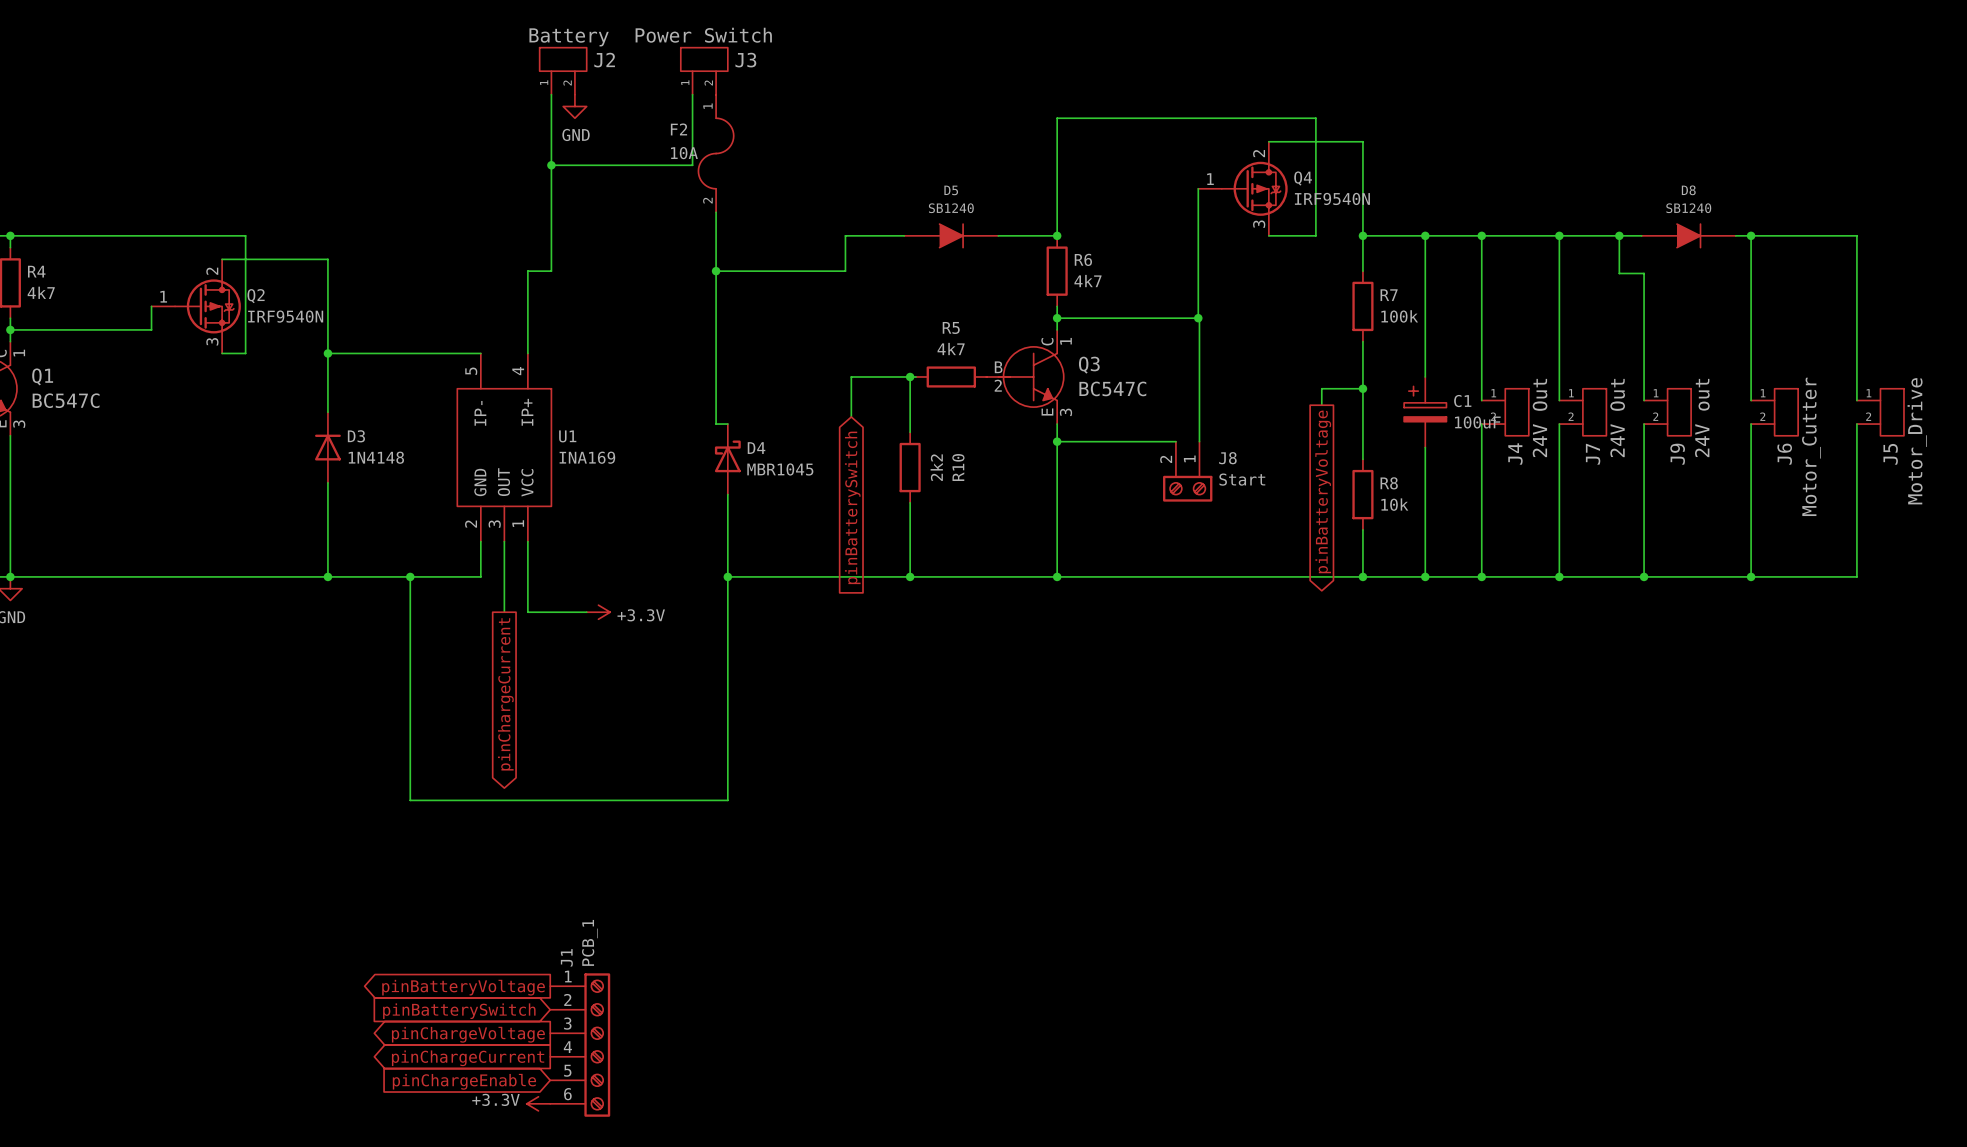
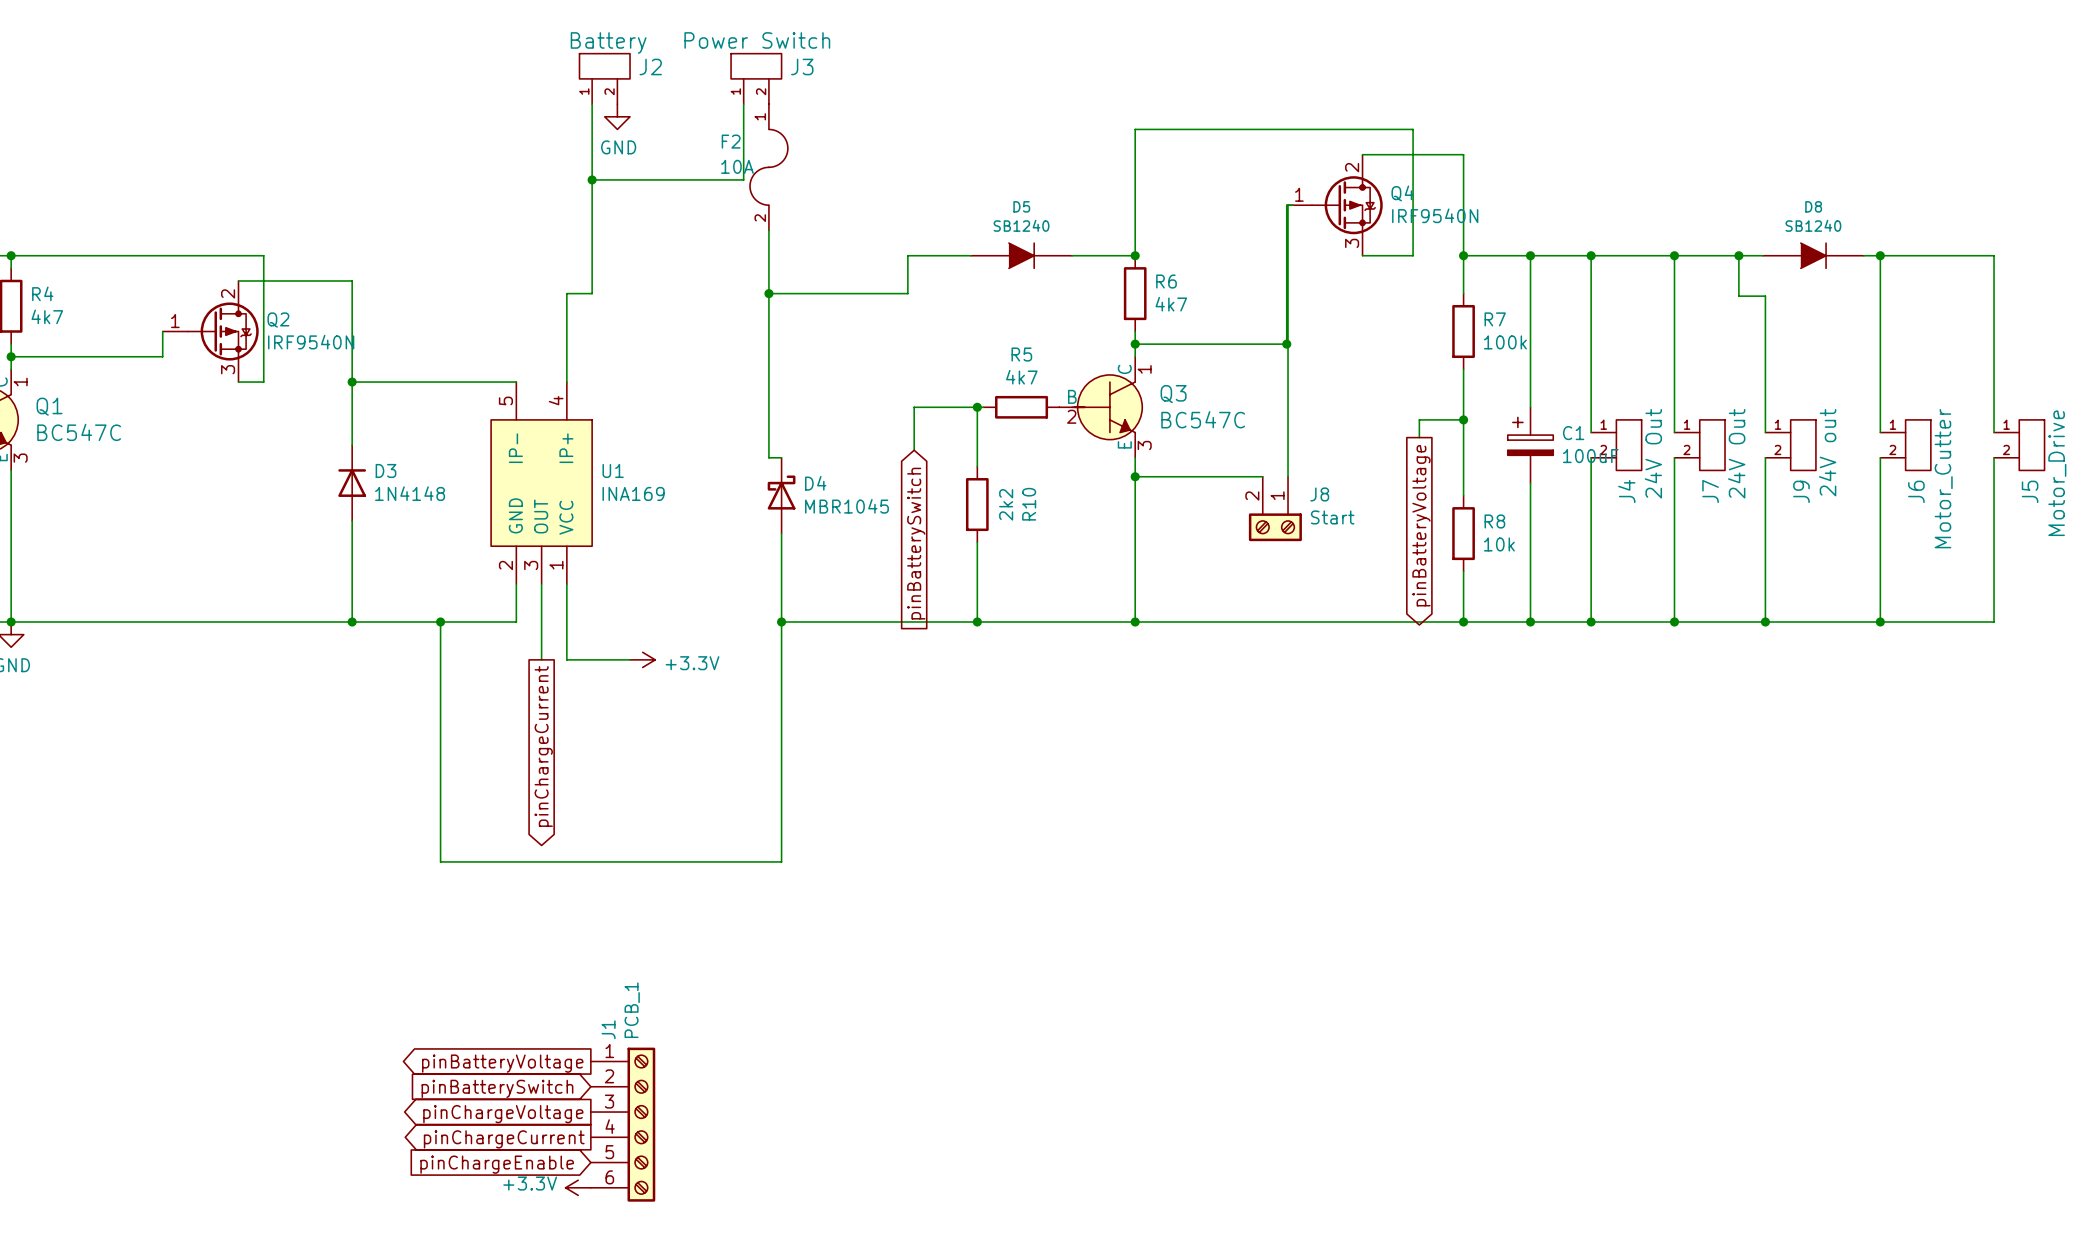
wire: none -> (1293, 205) (1288, 205) (1288, 344)

